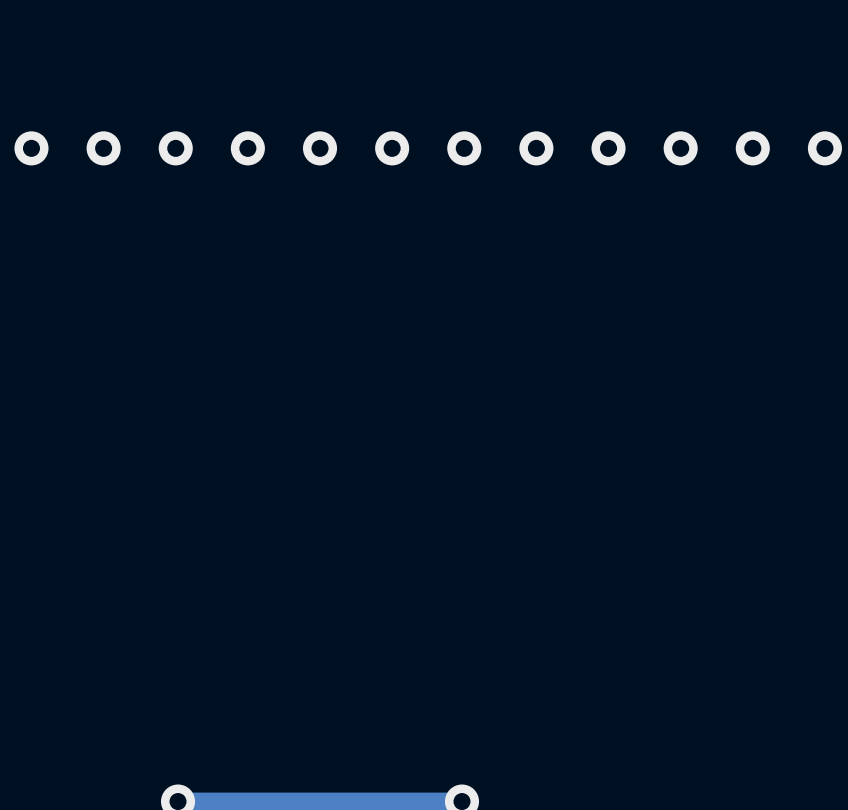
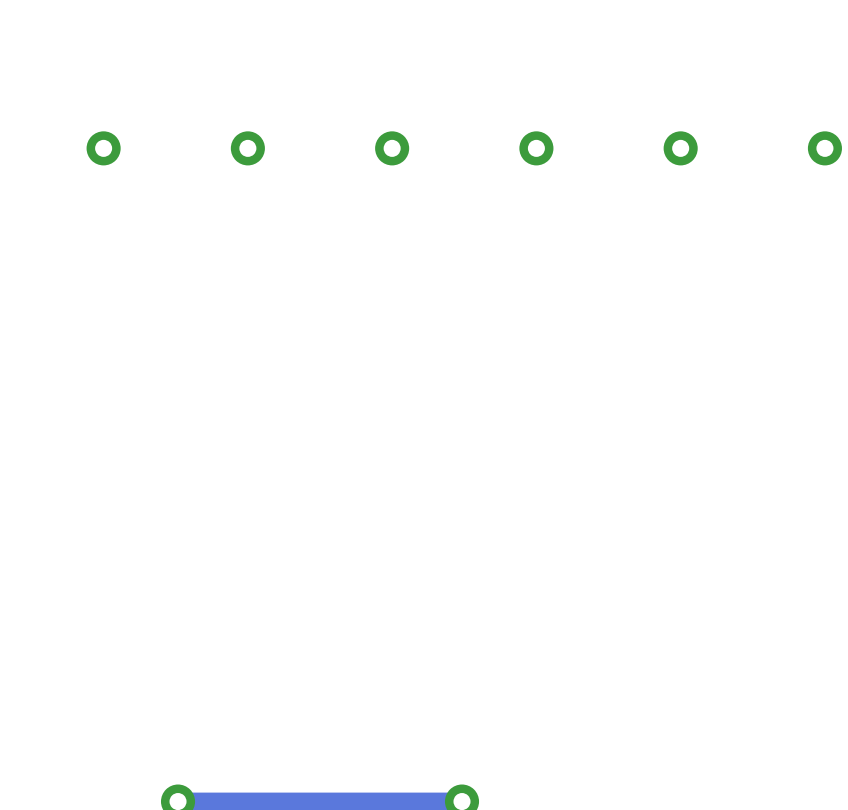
via: (31, 148) -> none
via: (175, 148) -> none
via: (320, 148) -> none
via: (464, 148) -> none
via: (608, 148) -> none
via: (752, 148) -> none

